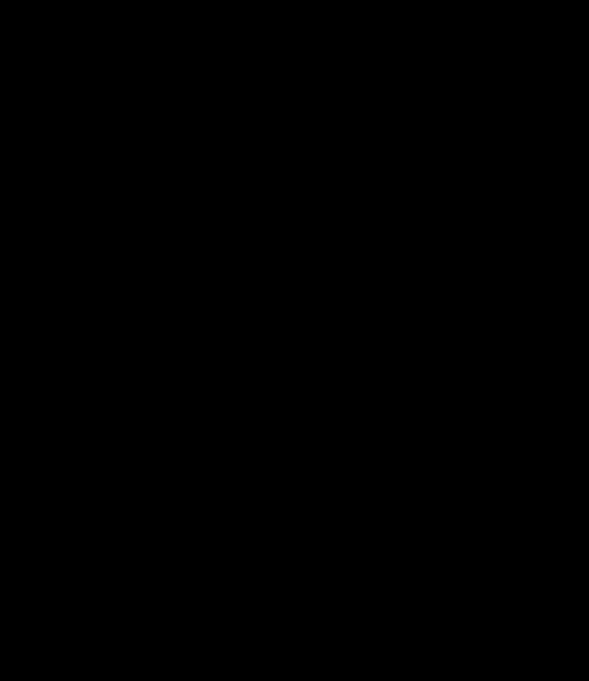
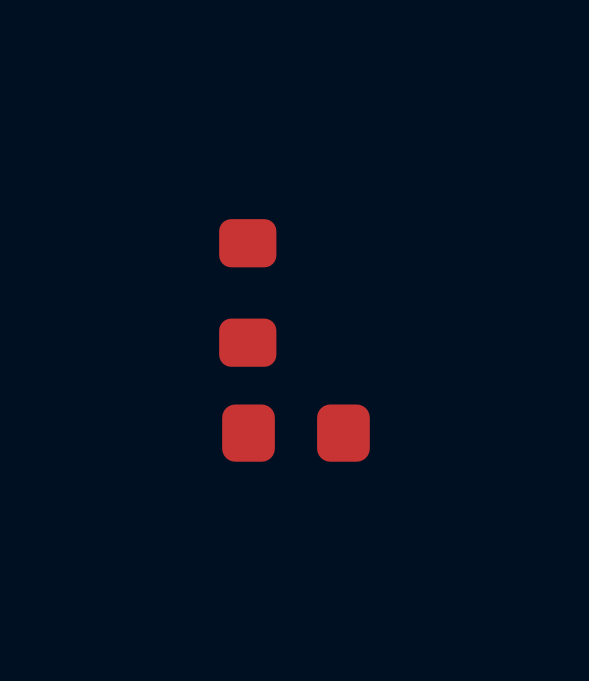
part: none -> (247, 292)
part: none -> (295, 433)

